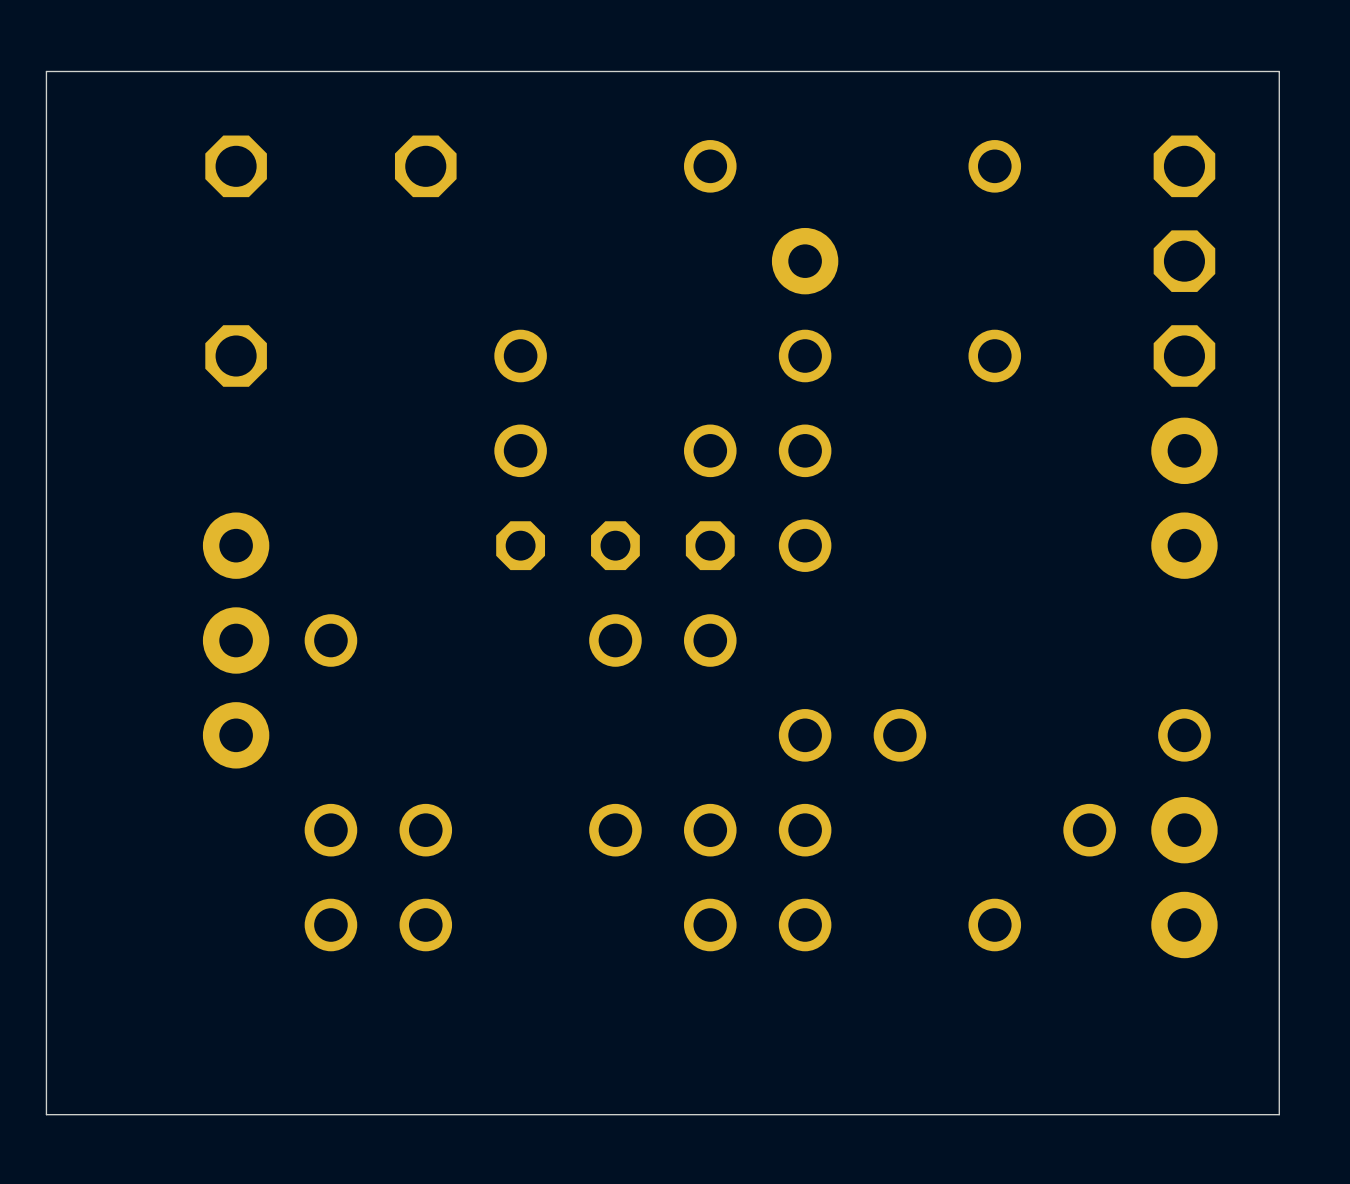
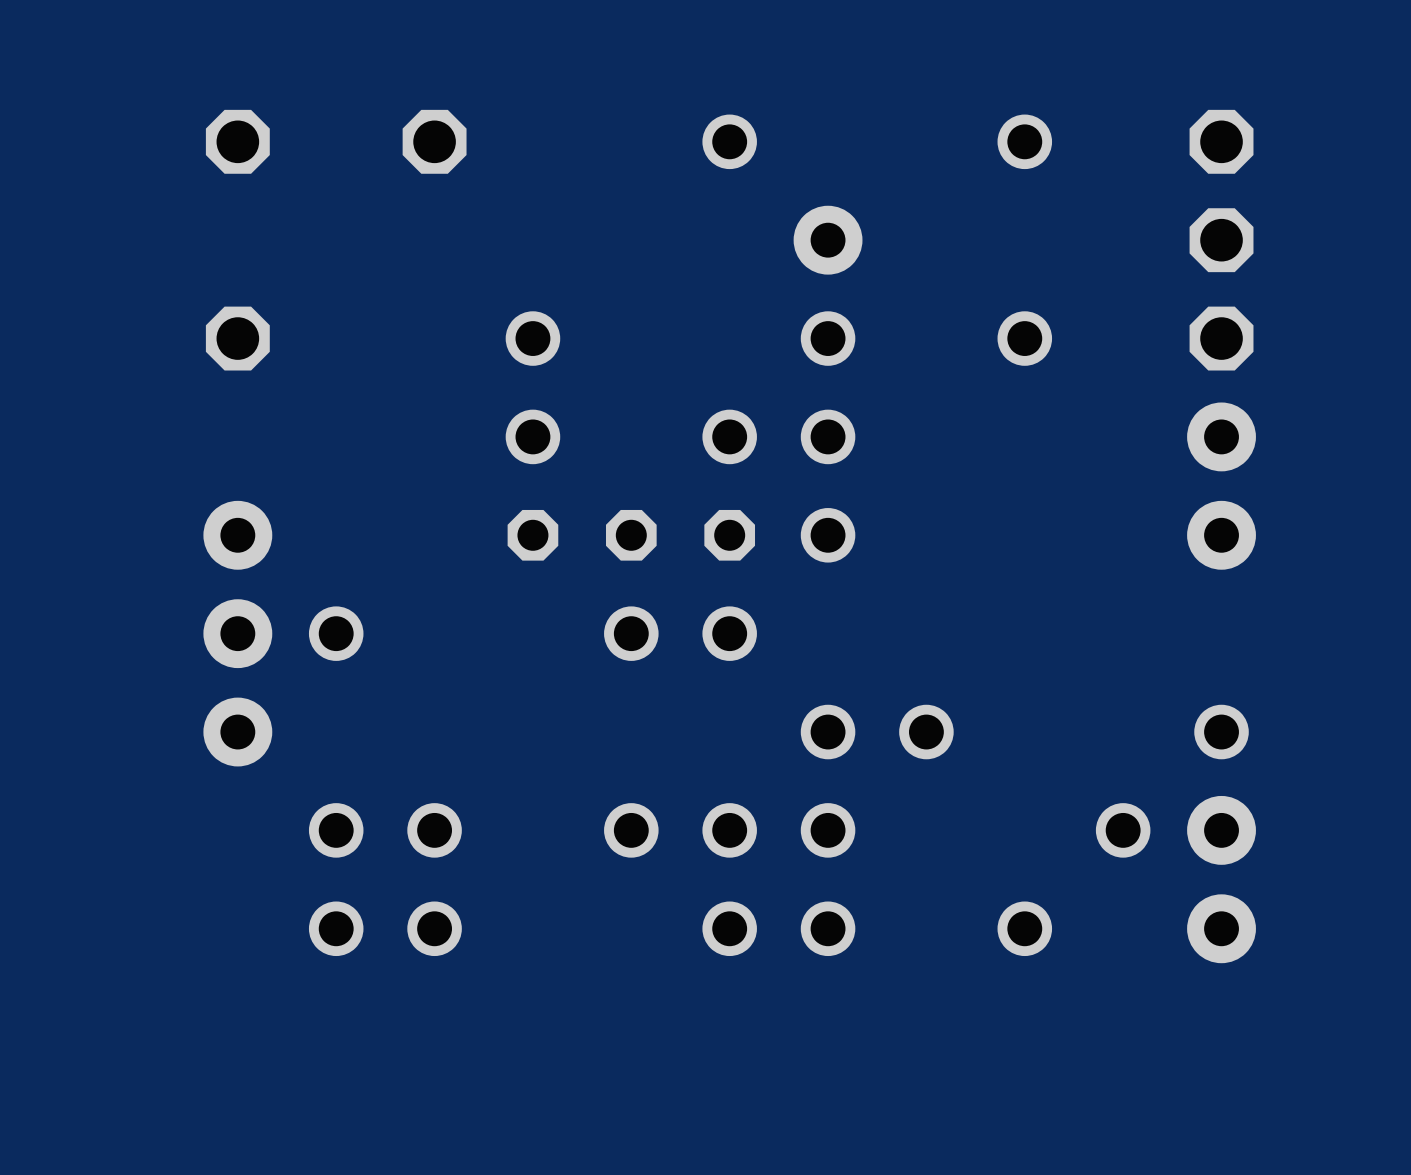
board edge: (1279, 71) (46, 71) (46, 1114) (1279, 1114) (1279, 71) -> none

